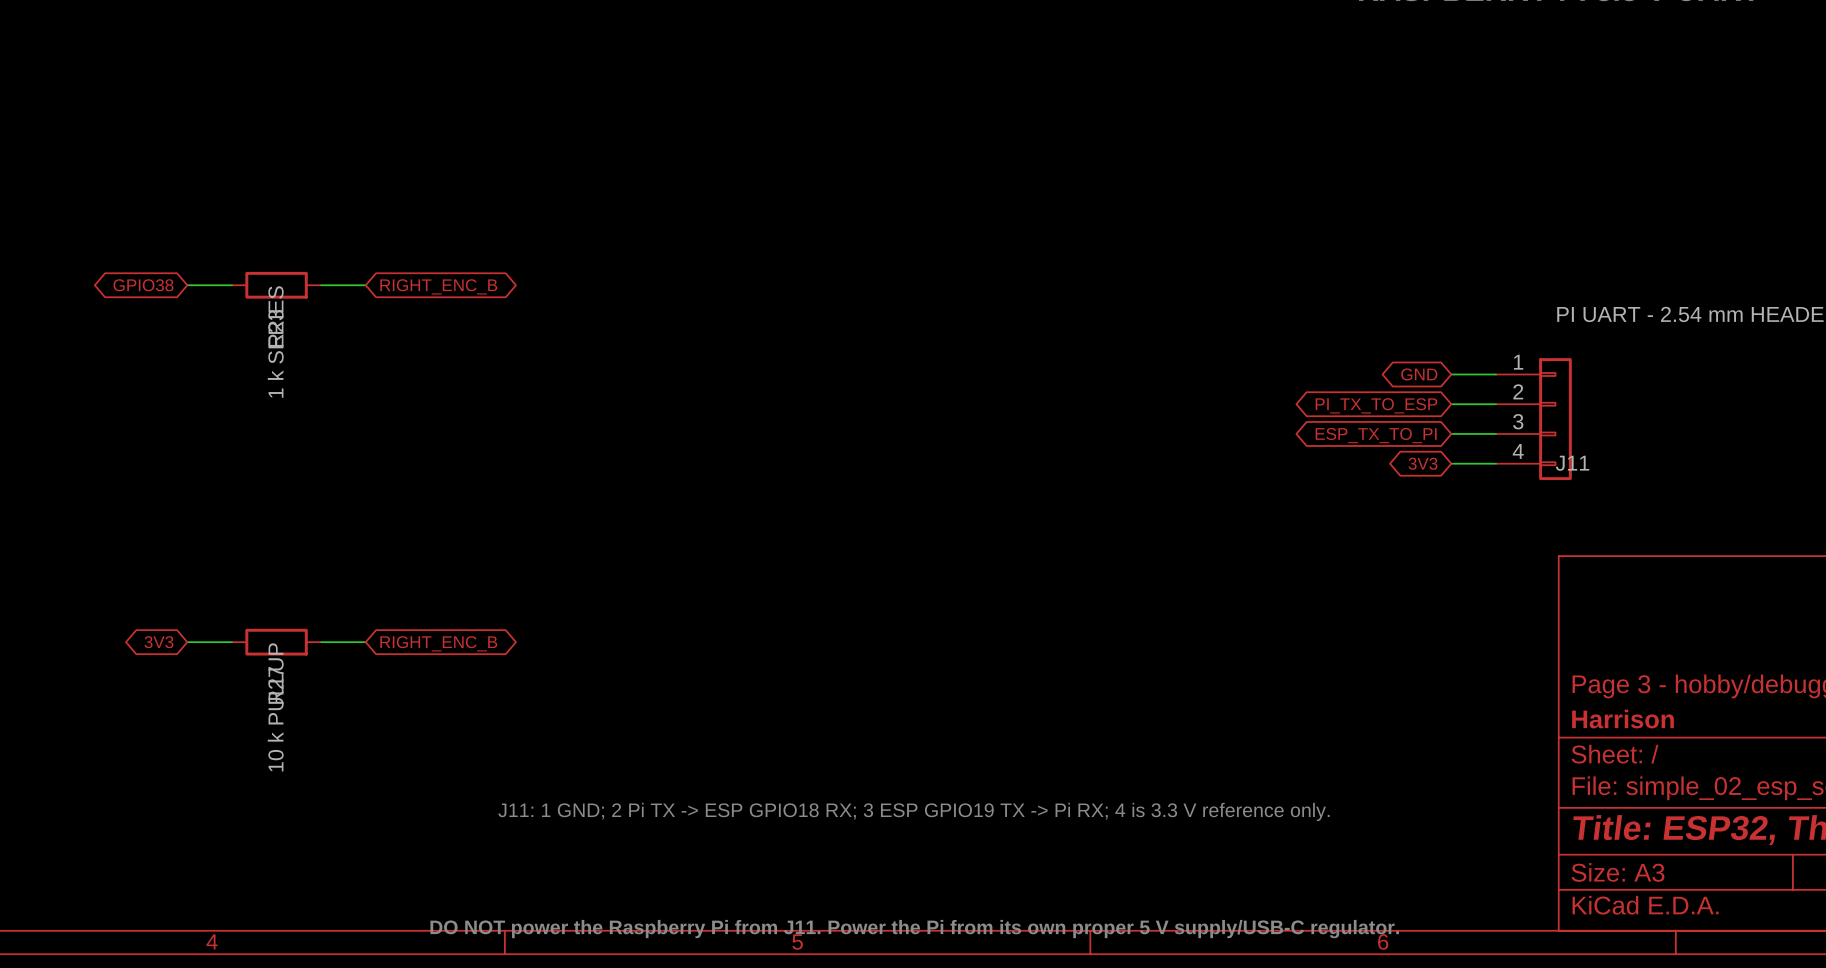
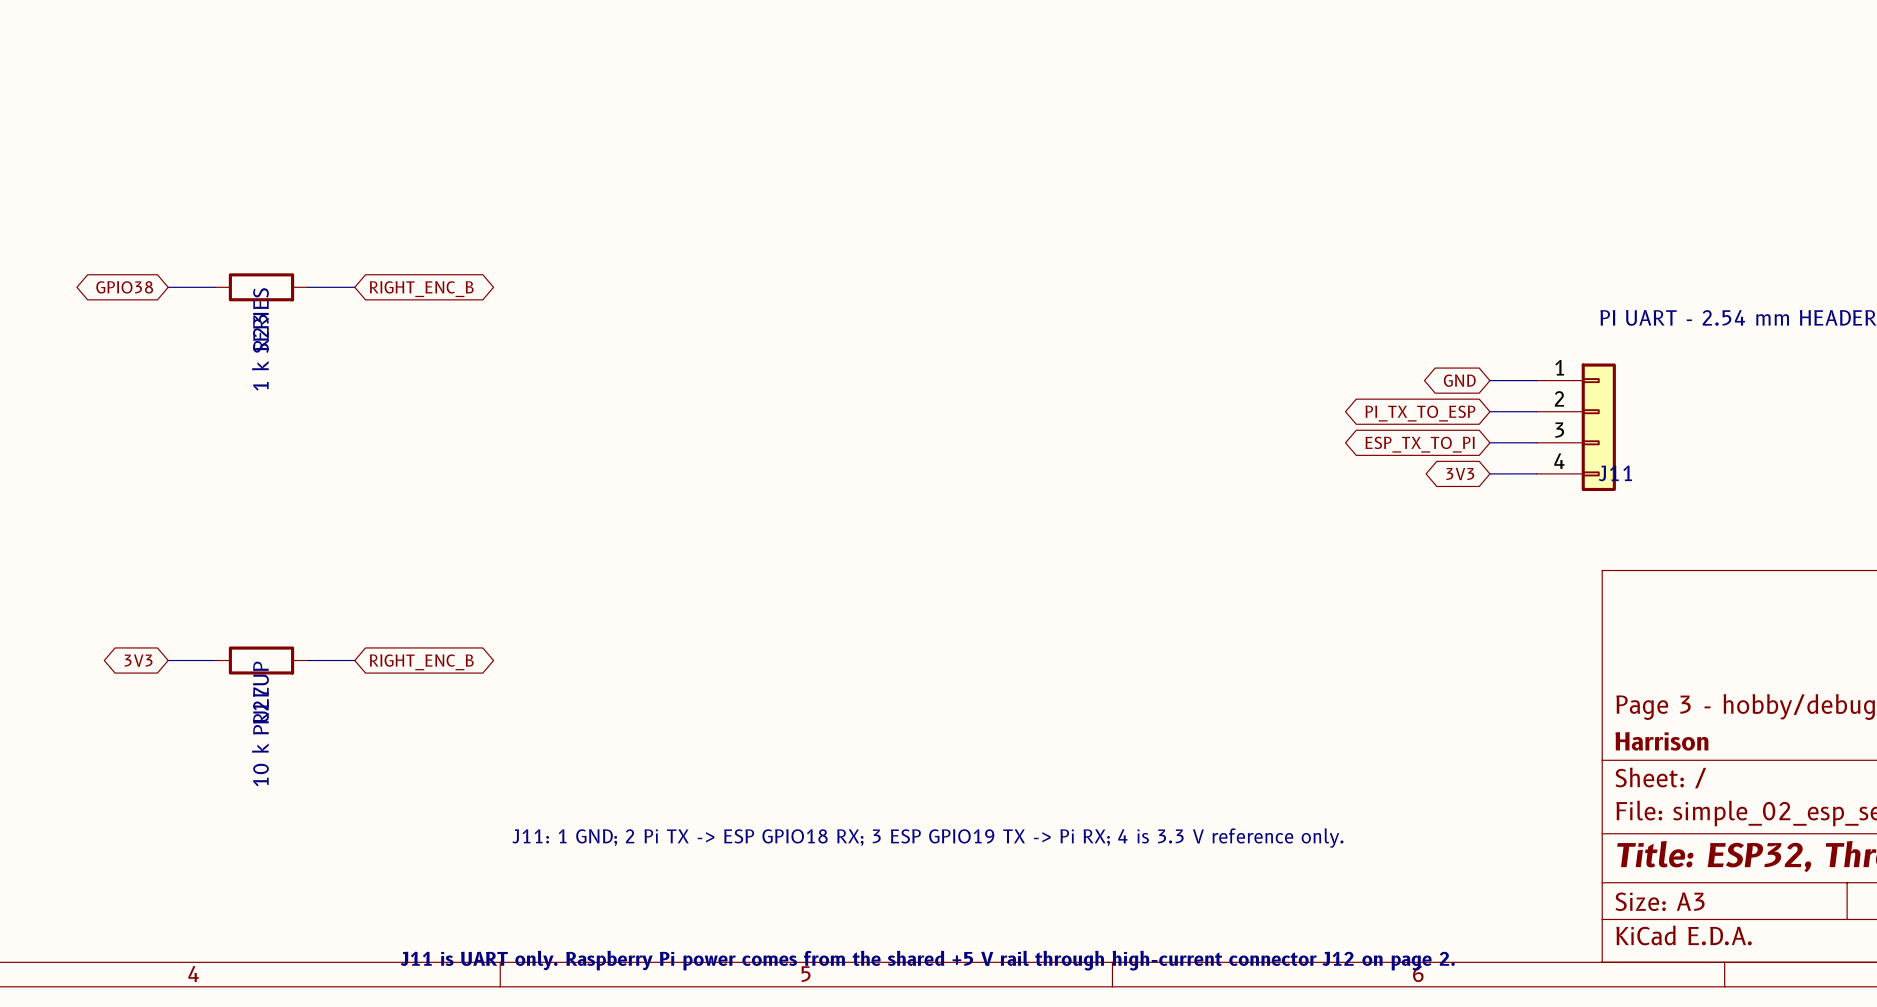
text: DO NOT power the Raspberry Pi from J11. Power the Pi from its own proper 5 V supply/USB-C regulator. (914, 929) -> J11 is UART only. Raspberry Pi power comes from the shared +5 V rail through high-current connector J12 on page 2. (927, 960)

